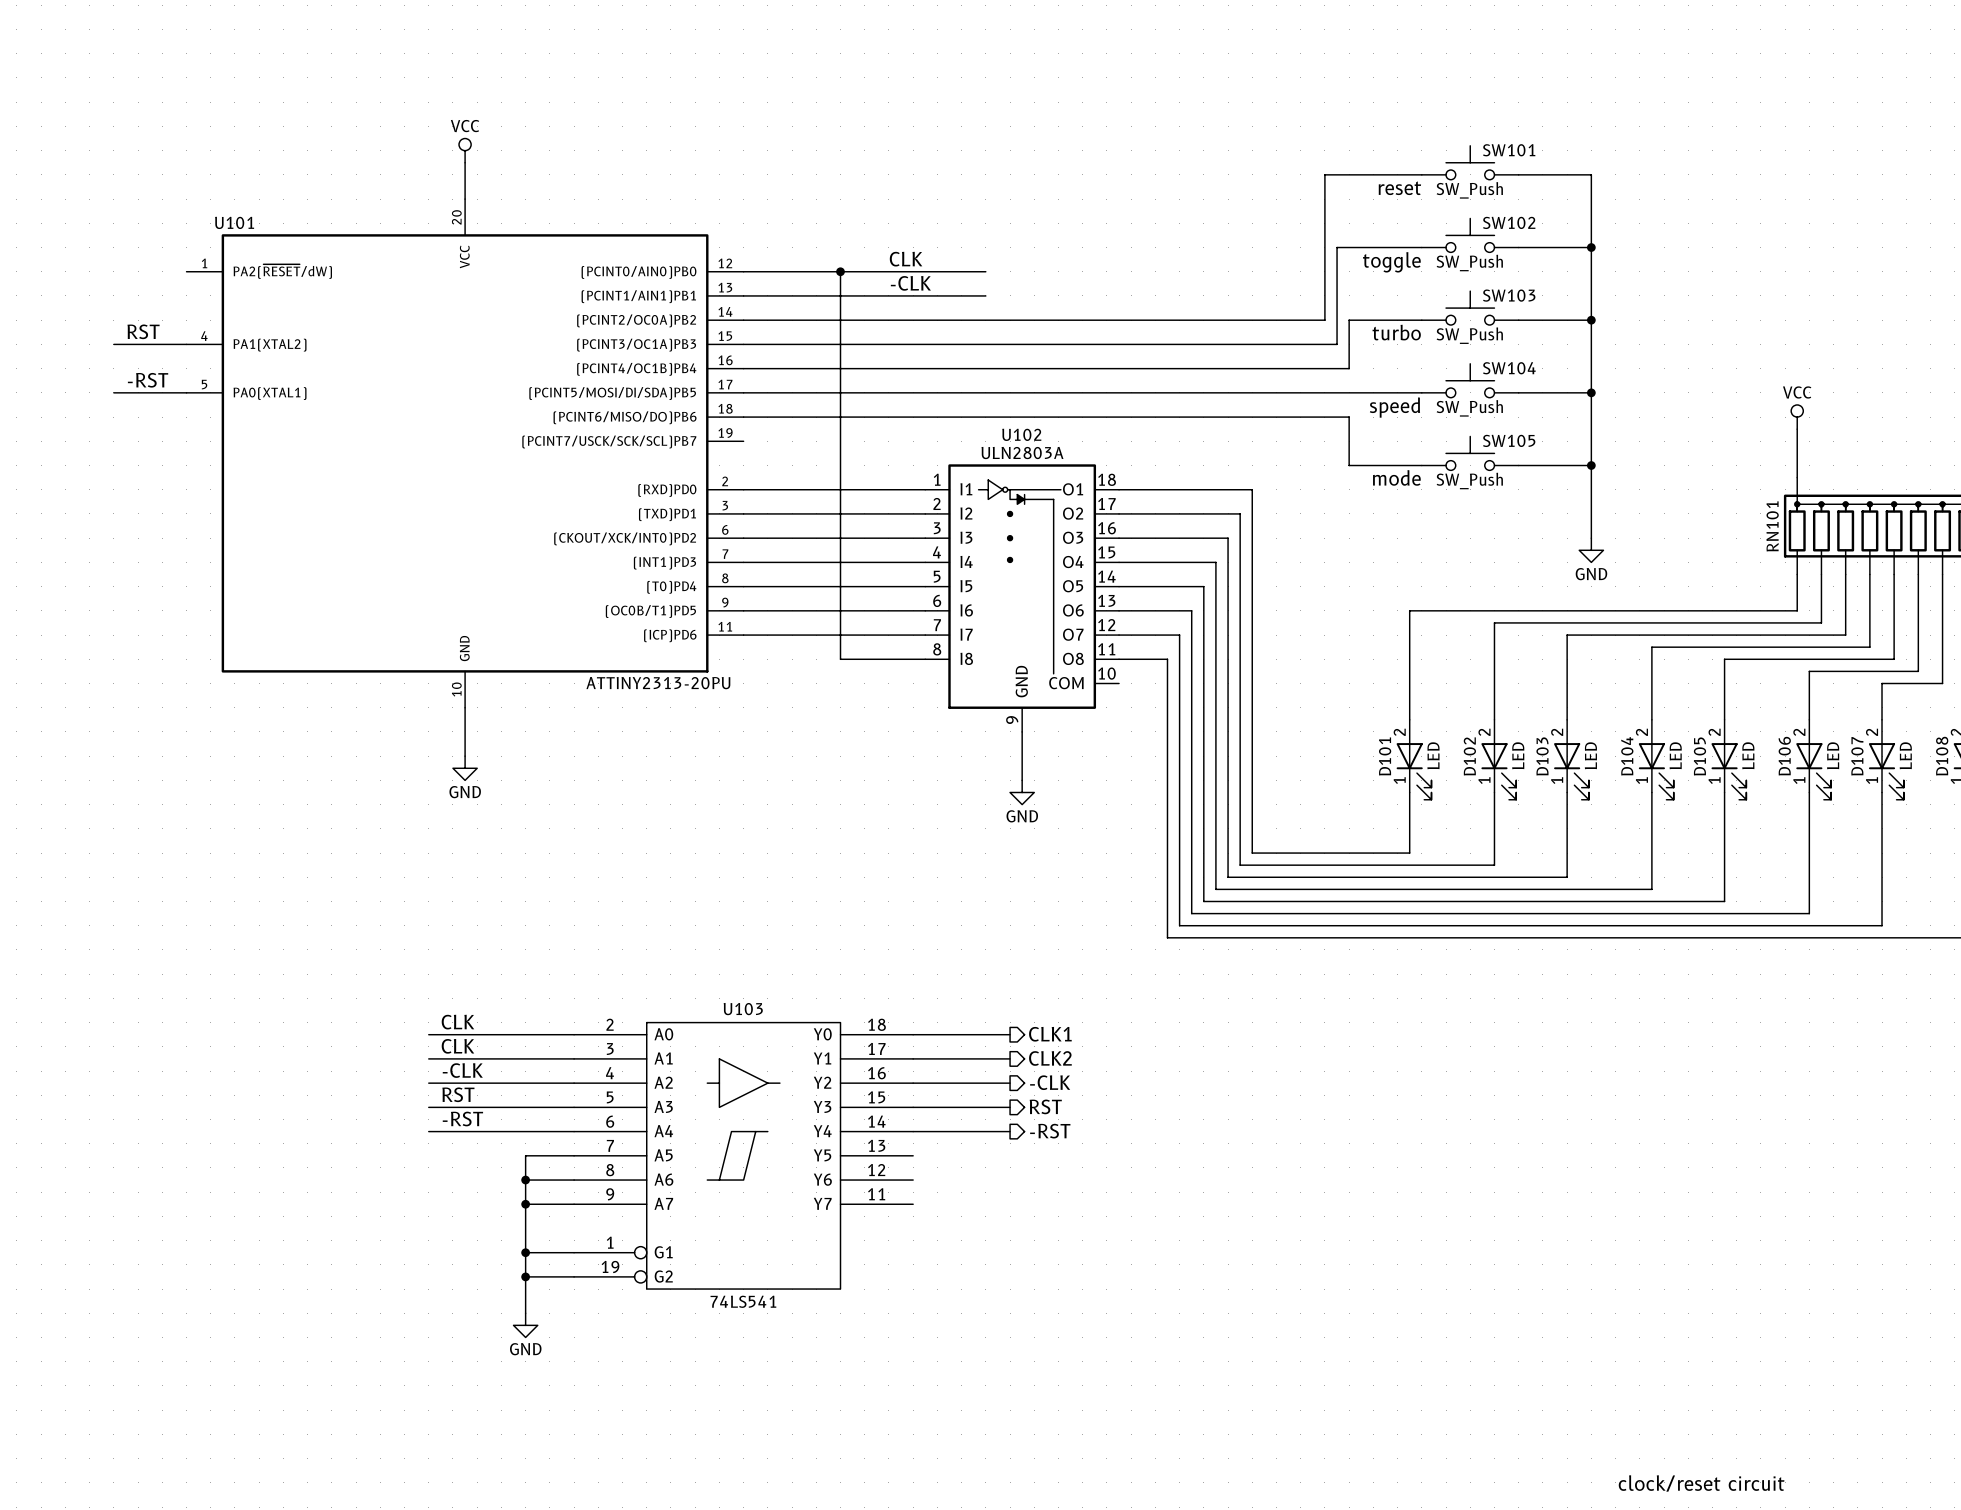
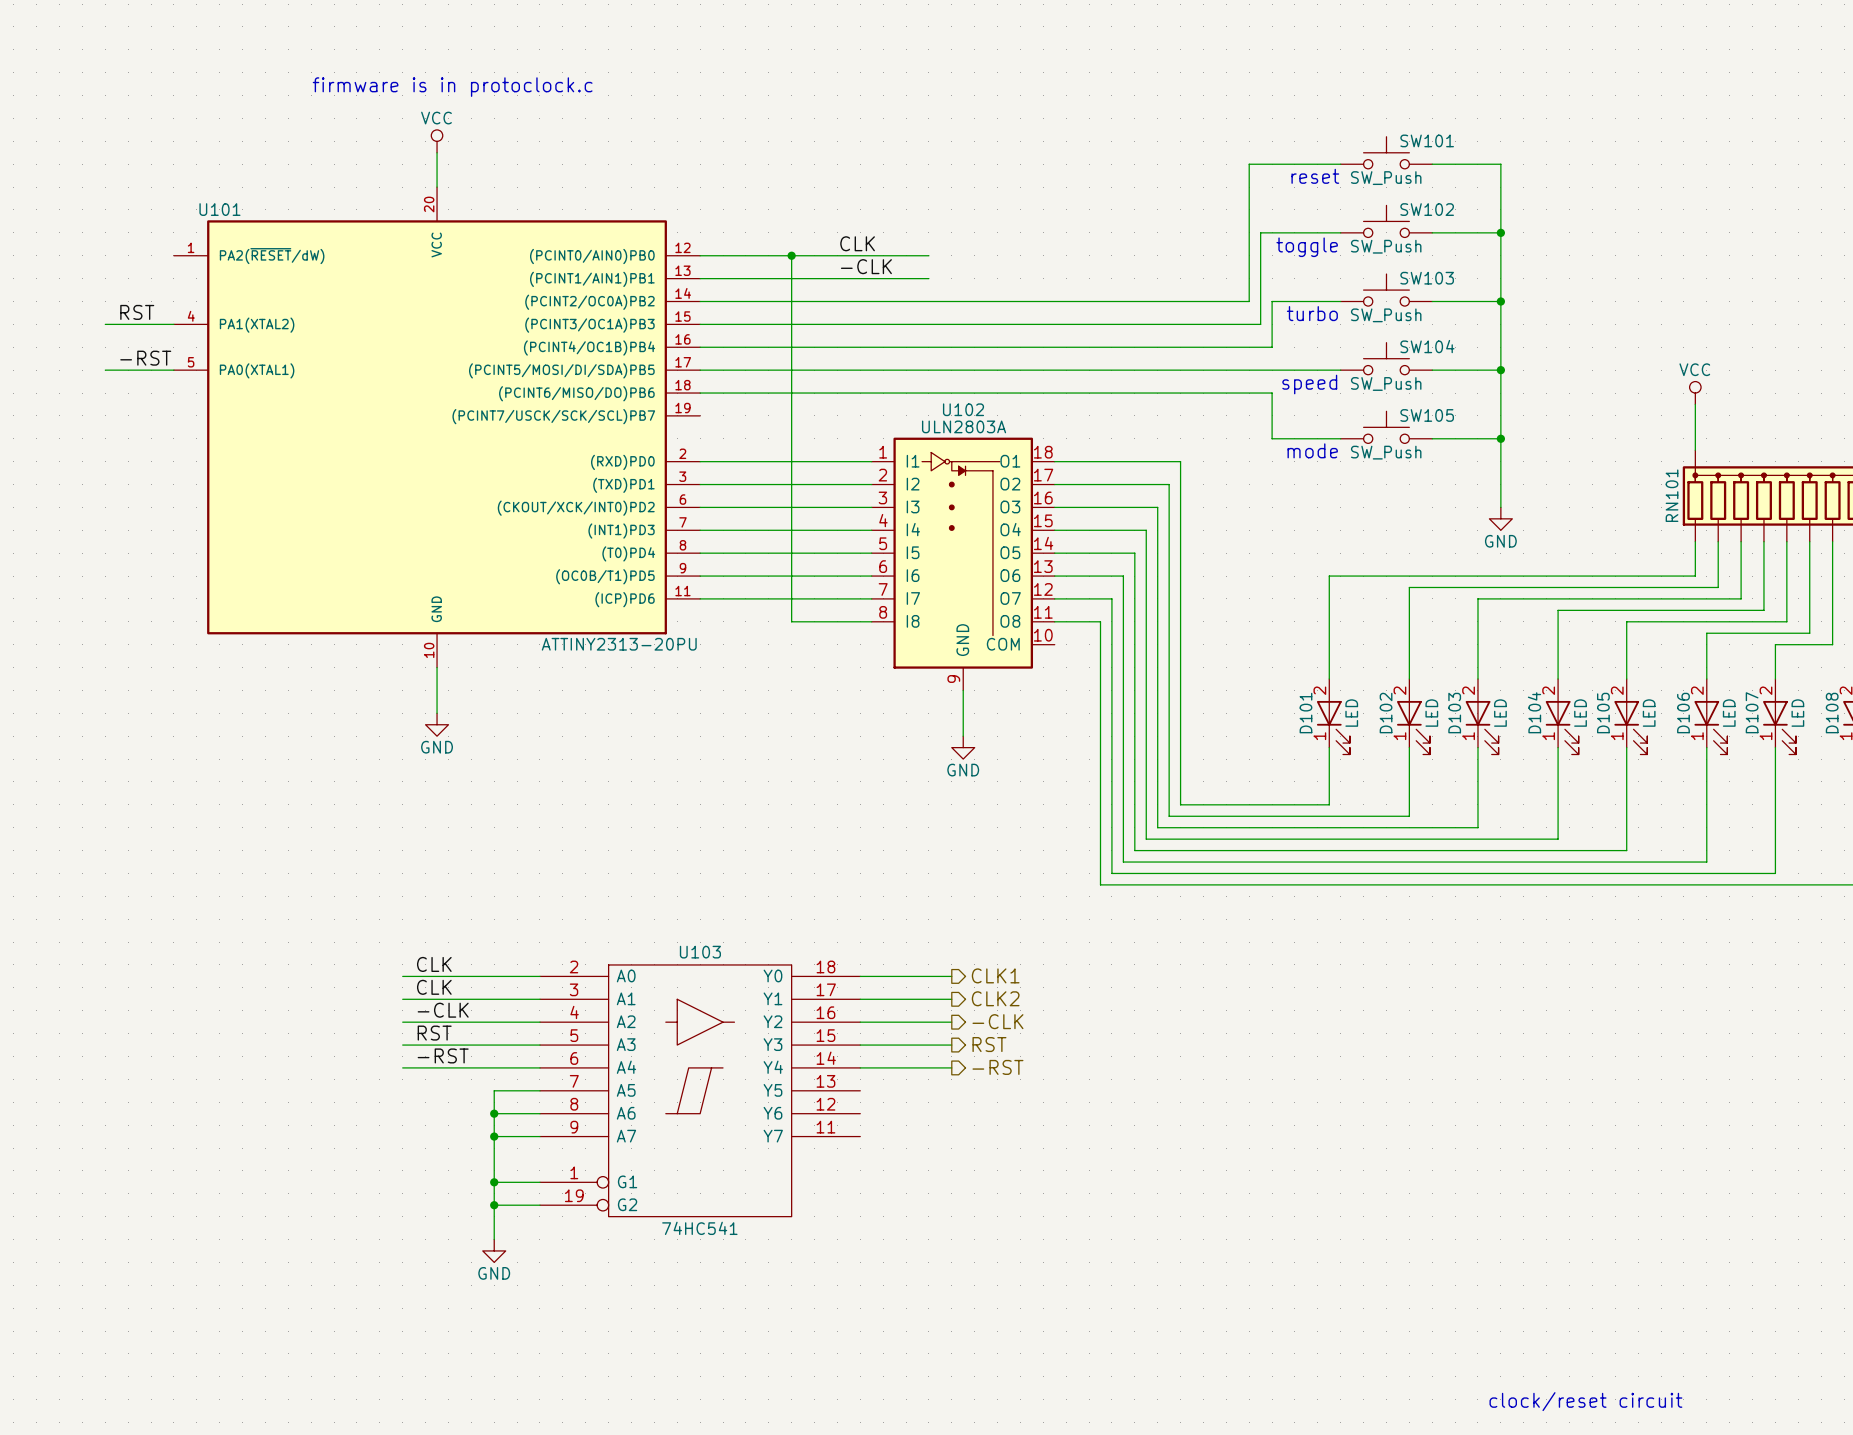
text: none -> firmware is in protoclock.c (452, 87)
U103 value: 74LS541 (743, 1301) -> 74HC541 (699, 1228)

